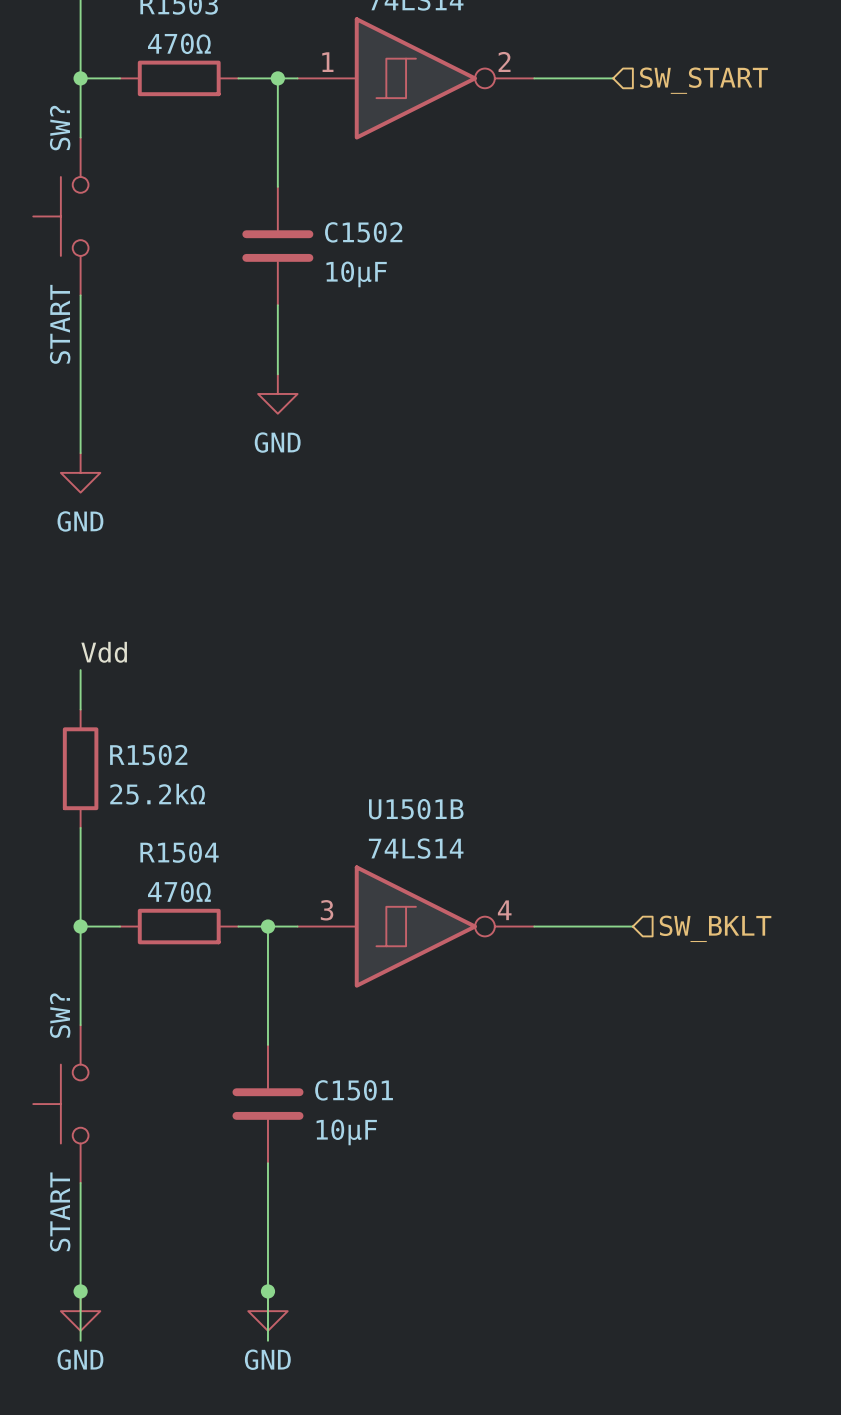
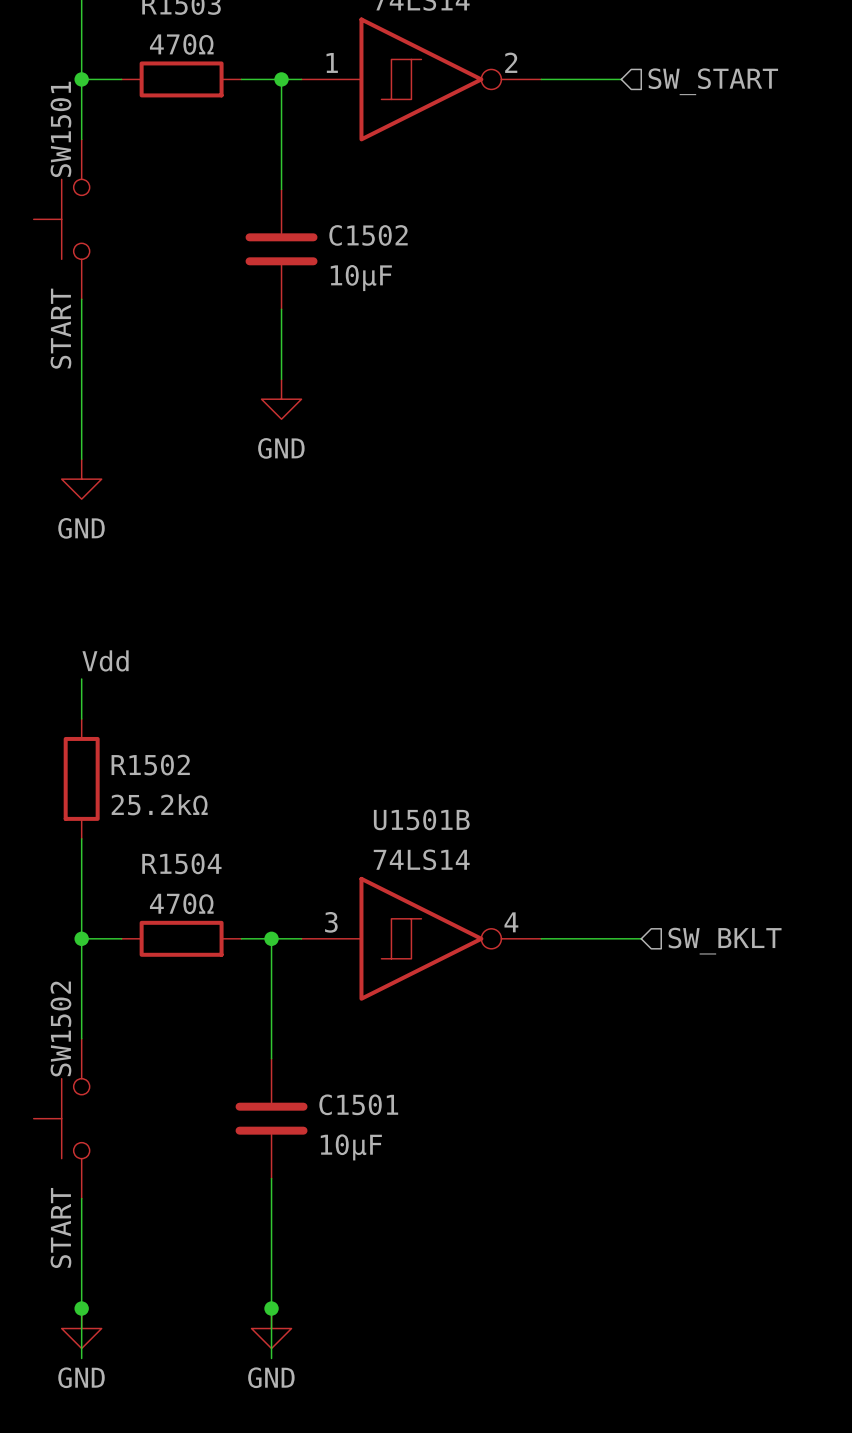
SW? name: SW? (60, 128) -> SW1501 (60, 129)
SW? name: SW? (60, 1015) -> SW1502 (60, 1028)

